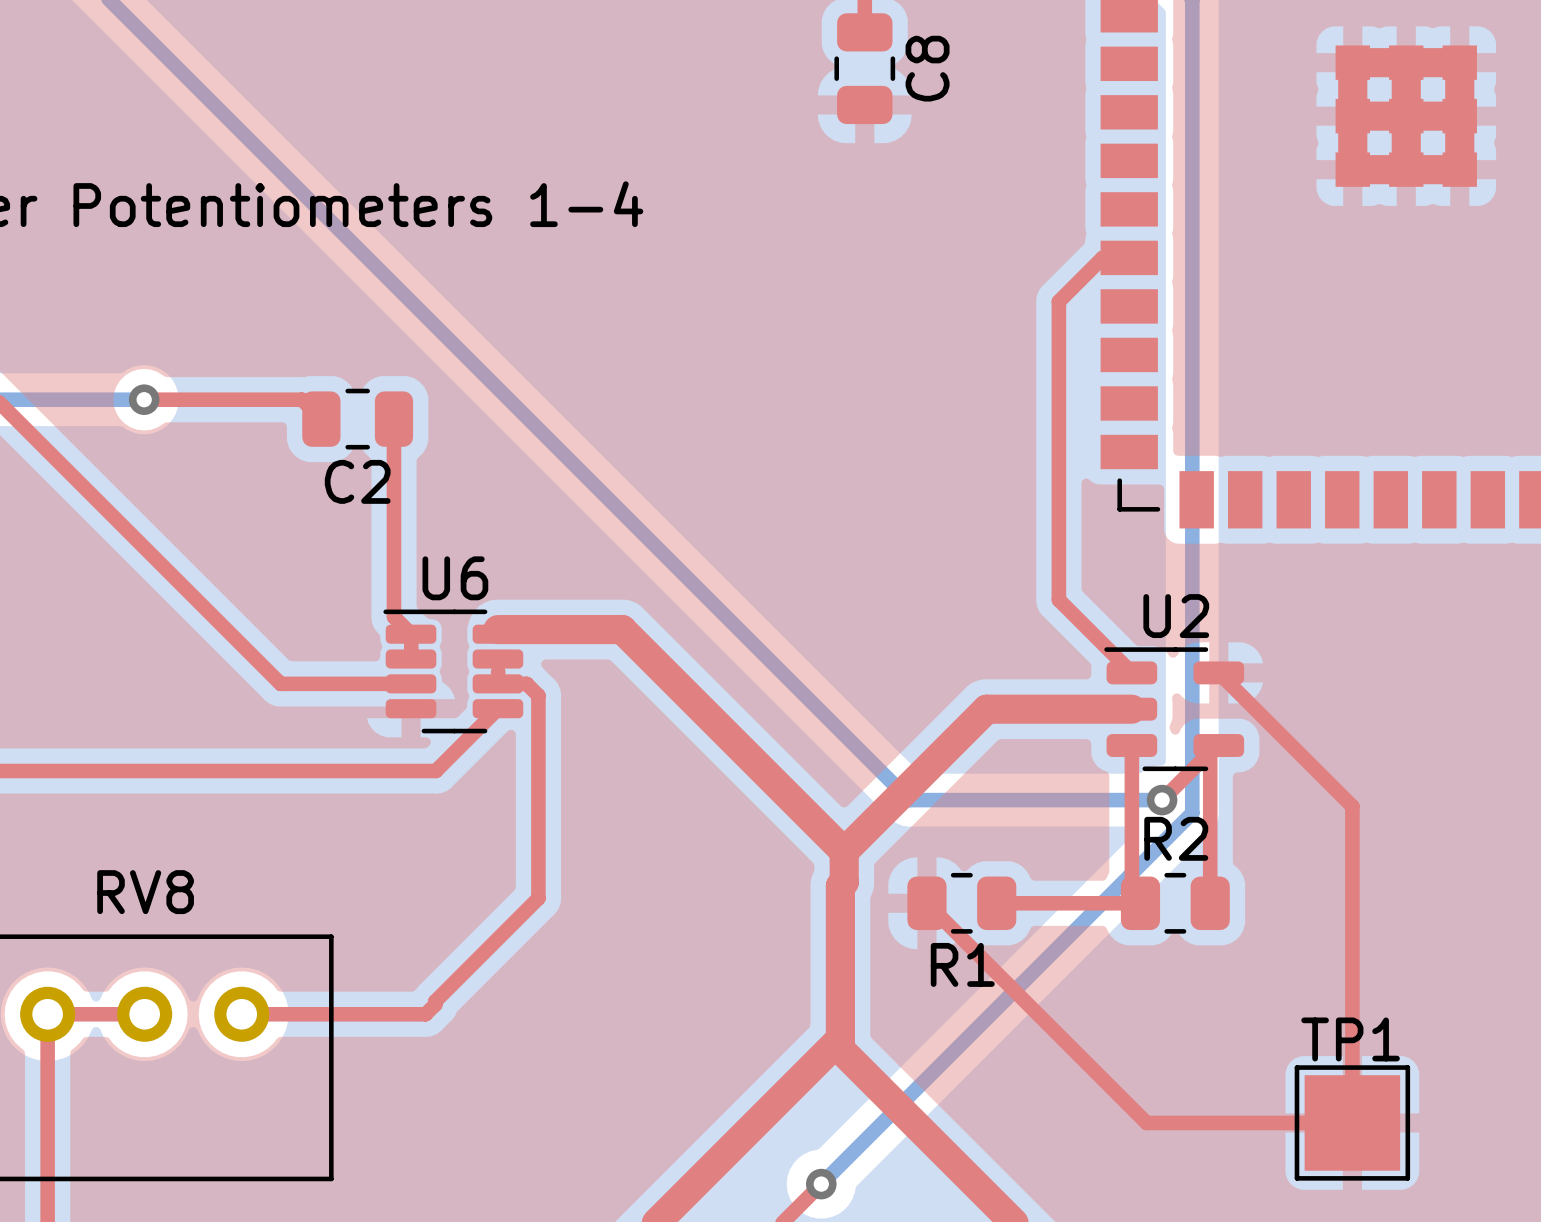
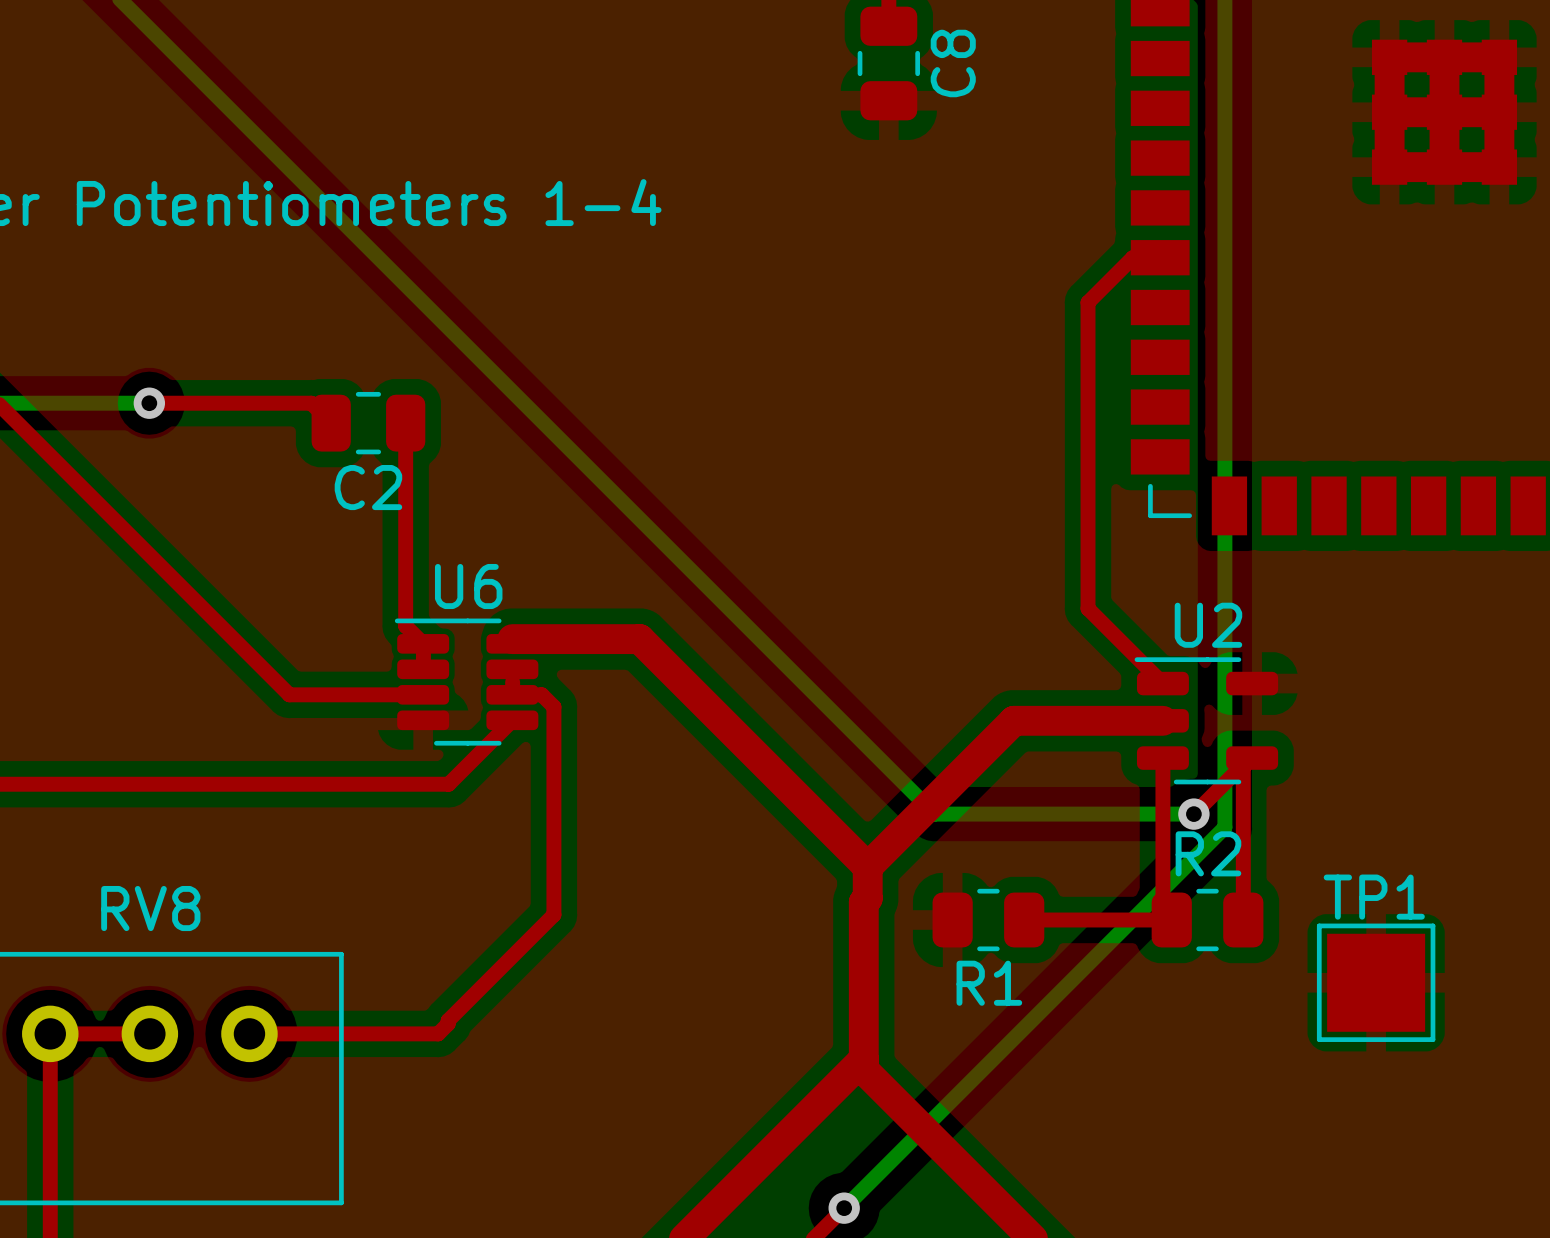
top track: (1218, 672) (1352, 806) (1352, 1122) (1146, 1122) (926, 903) -> none
TP1 position: (1352, 1122) -> (1376, 982)

